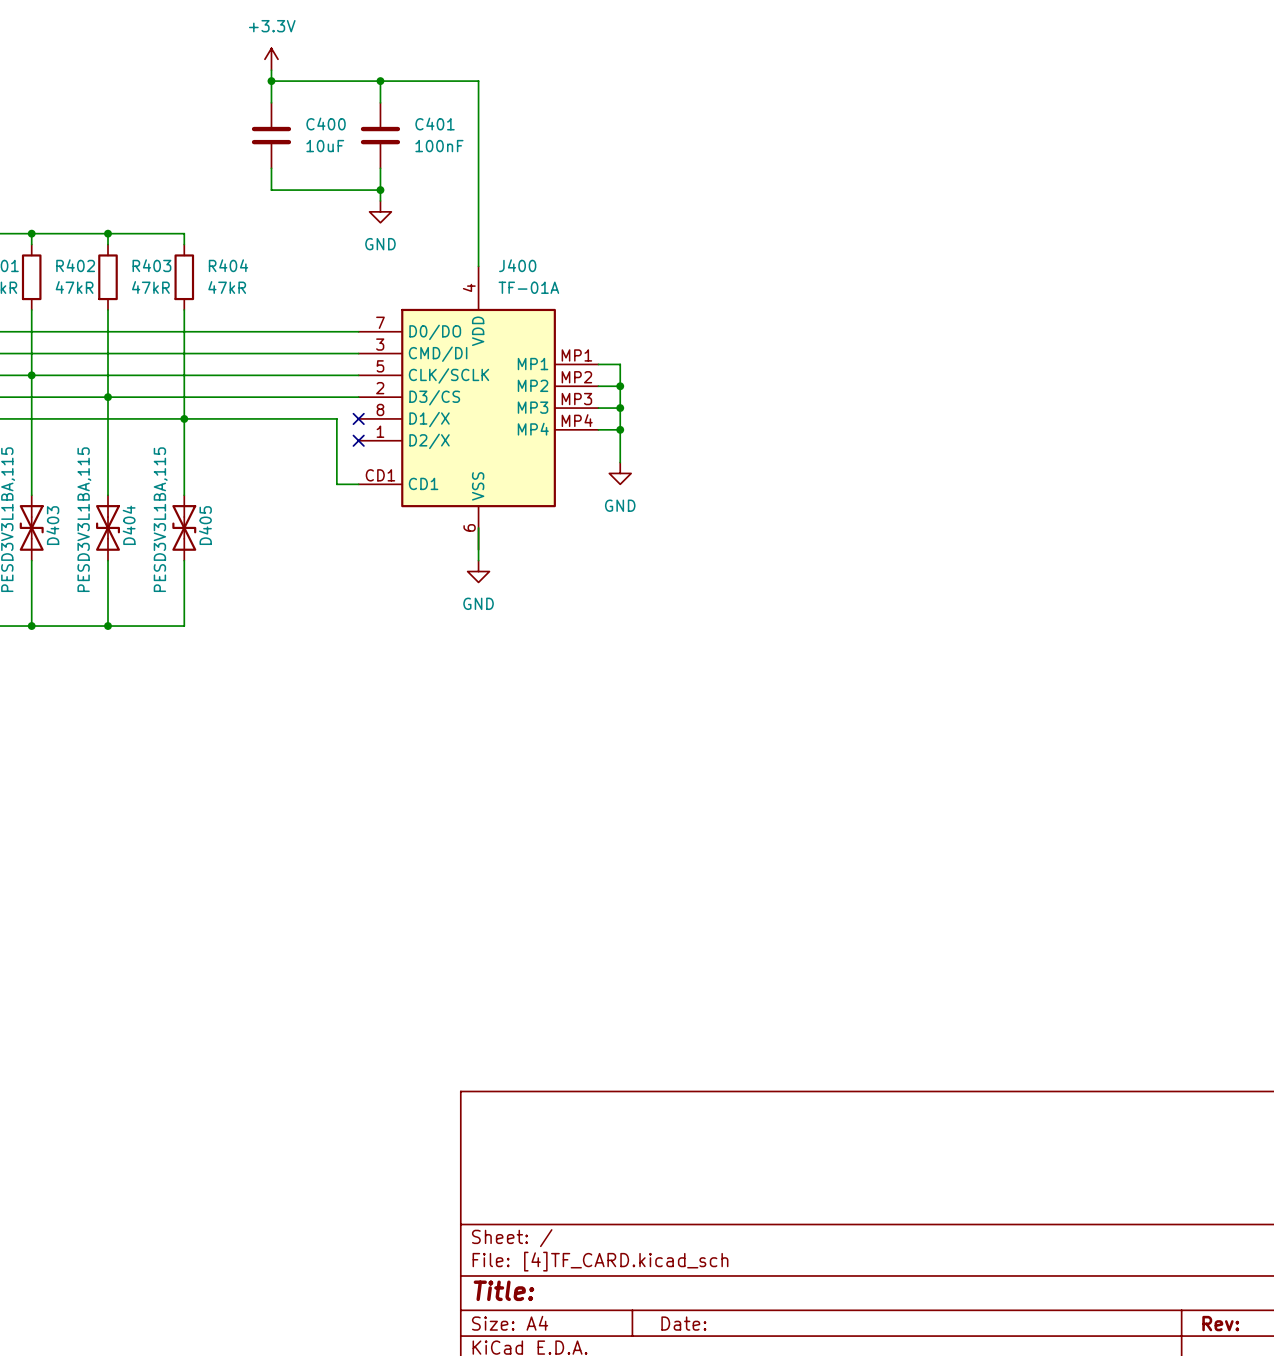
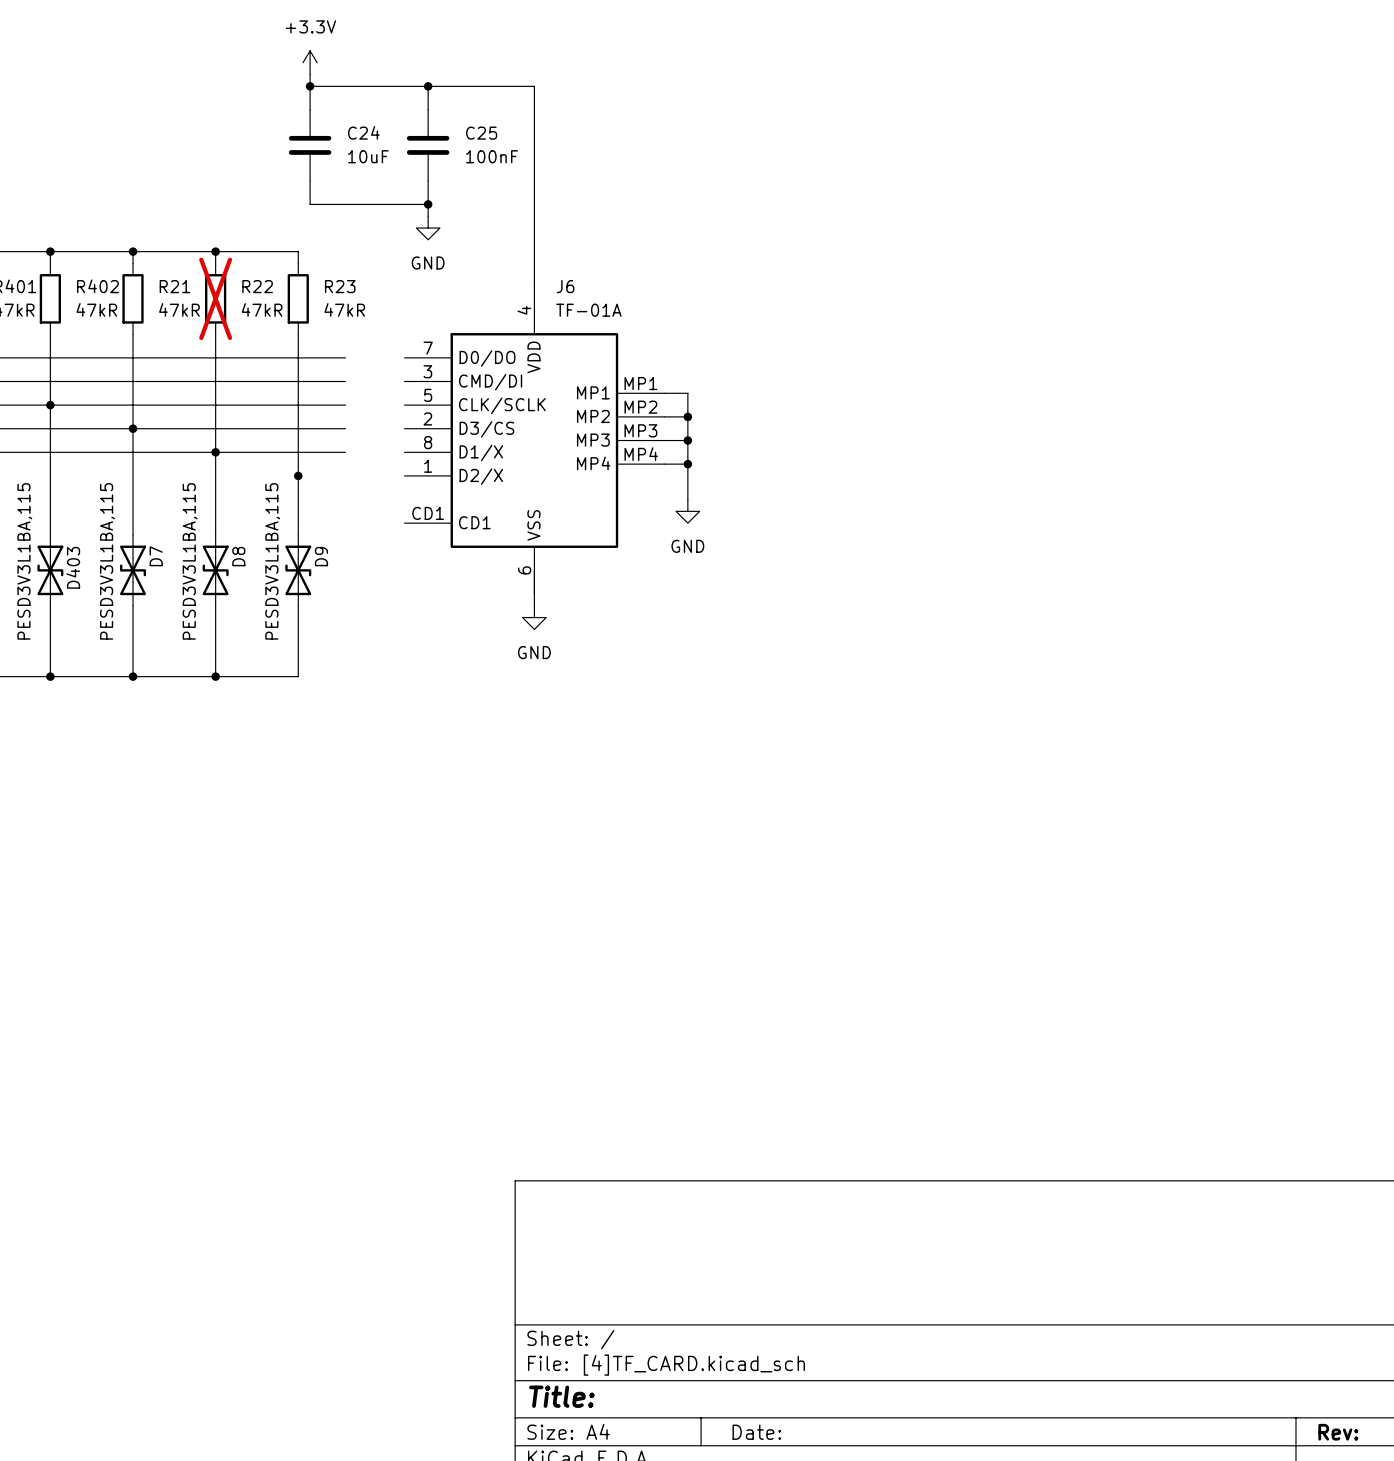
C400 name: C400 (326, 124) -> C24 (363, 132)
C401 name: C401 (435, 124) -> C25 (481, 133)
wire: none -> (215, 251) (298, 251) (298, 263)
junction: none -> (215, 251)
R403 name: R403 (151, 265) -> R21 (174, 286)
R404 name: R404 (228, 265) -> R22 (257, 286)
J400 name: J400 (517, 265) -> J6 (565, 286)
R404 do-not-place cross: none -> (215, 298)
R23: none -> 47kR (298, 298)
wire: none -> (298, 334) (298, 534)
wire: (304, 331) (358, 331) -> none
wire: (304, 353) (358, 353) -> none
wire: (304, 375) (358, 375) -> none
wire: (304, 397) (358, 397) -> none
wire: (304, 418) (336, 418) (336, 484) (358, 484) -> none
no-connect mark: (358, 418) -> none
junction: none -> (298, 475)
no-connect mark: (358, 440) -> none
D404 name: D404 (129, 525) -> D7 (156, 556)
D405 name: D405 (205, 525) -> D8 (238, 556)
D9: none -> PESD3V3L1BA,115 (298, 570)
wire: none -> (298, 605) (298, 676) (215, 676)
junction: none -> (215, 676)

